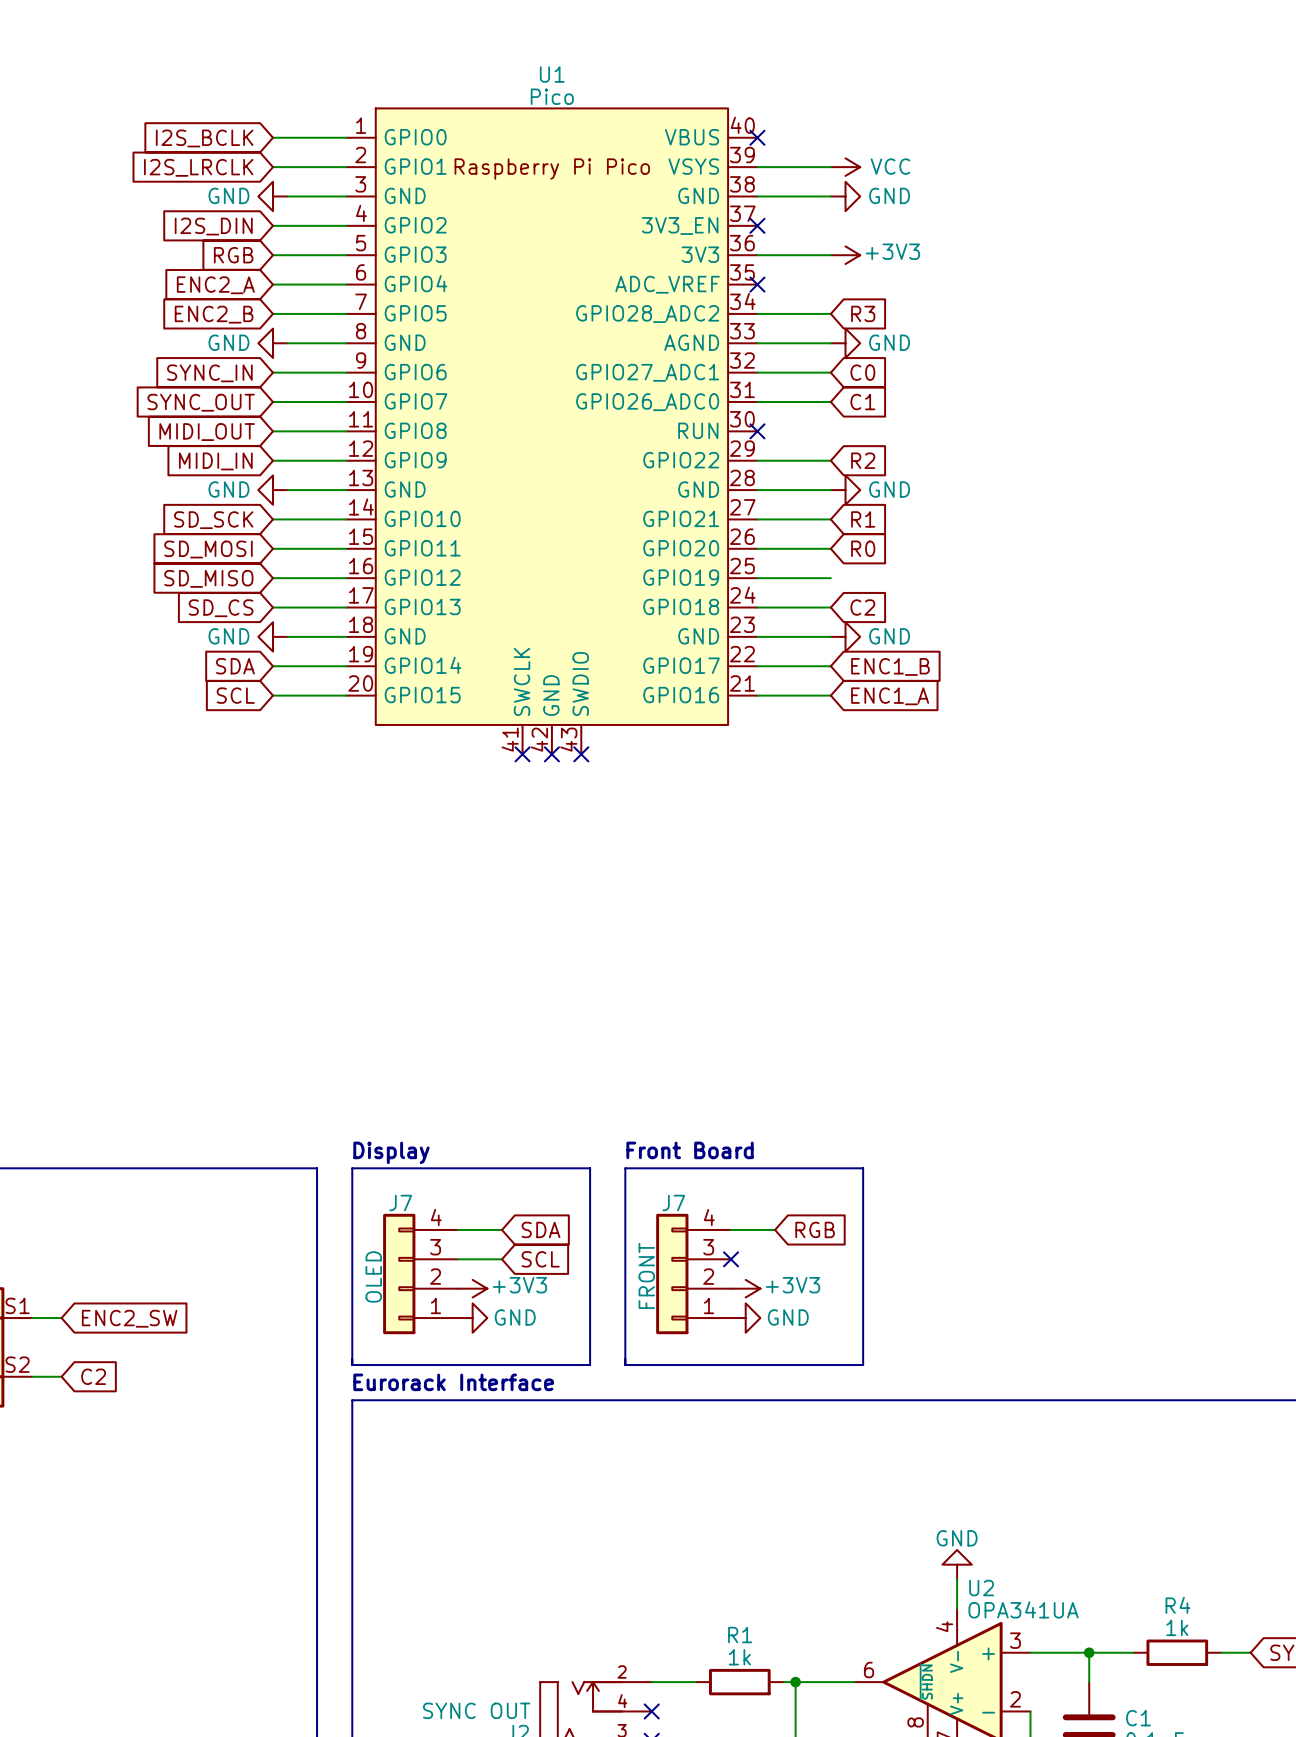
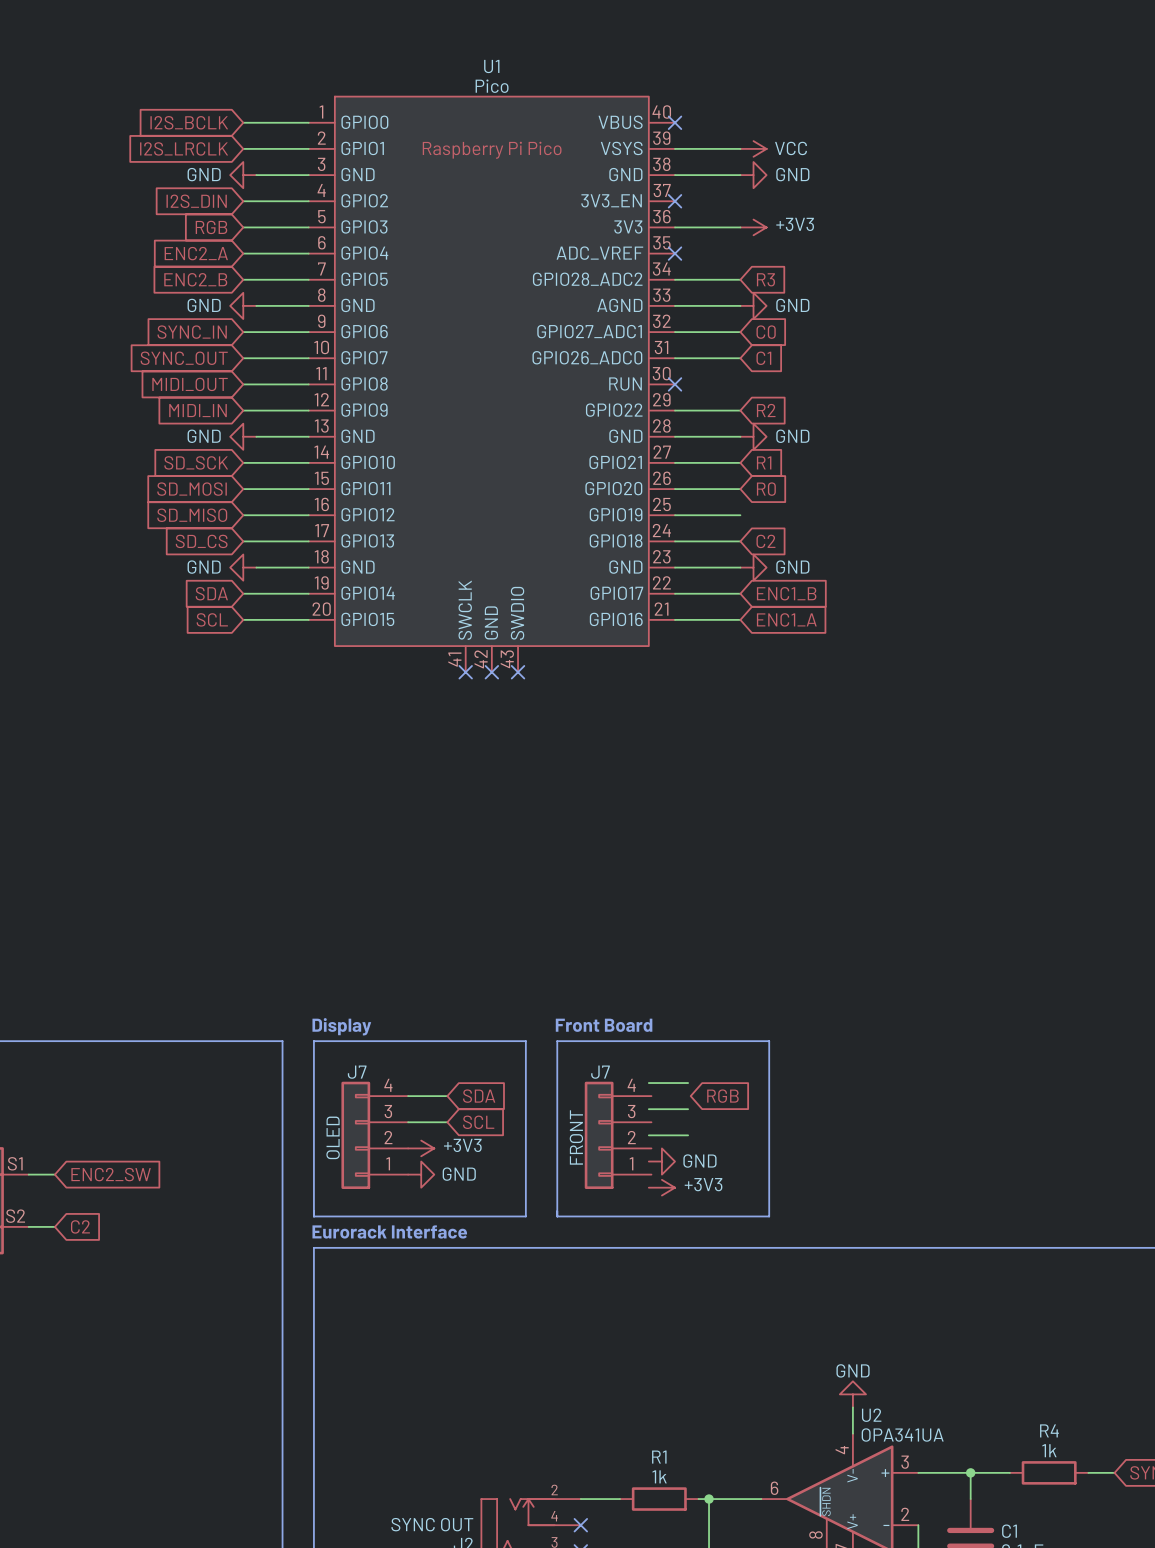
wire: none -> (648, 1083) (688, 1083)
wire: (731, 1229) (775, 1229) -> (648, 1109) (688, 1109)
no-connect mark: (731, 1259) -> none
wire: none -> (648, 1135) (688, 1135)
power symbol position: +3V3 (745, 1288) -> +3V3 (661, 1187)
power symbol position: GND (745, 1318) -> GND (661, 1161)

